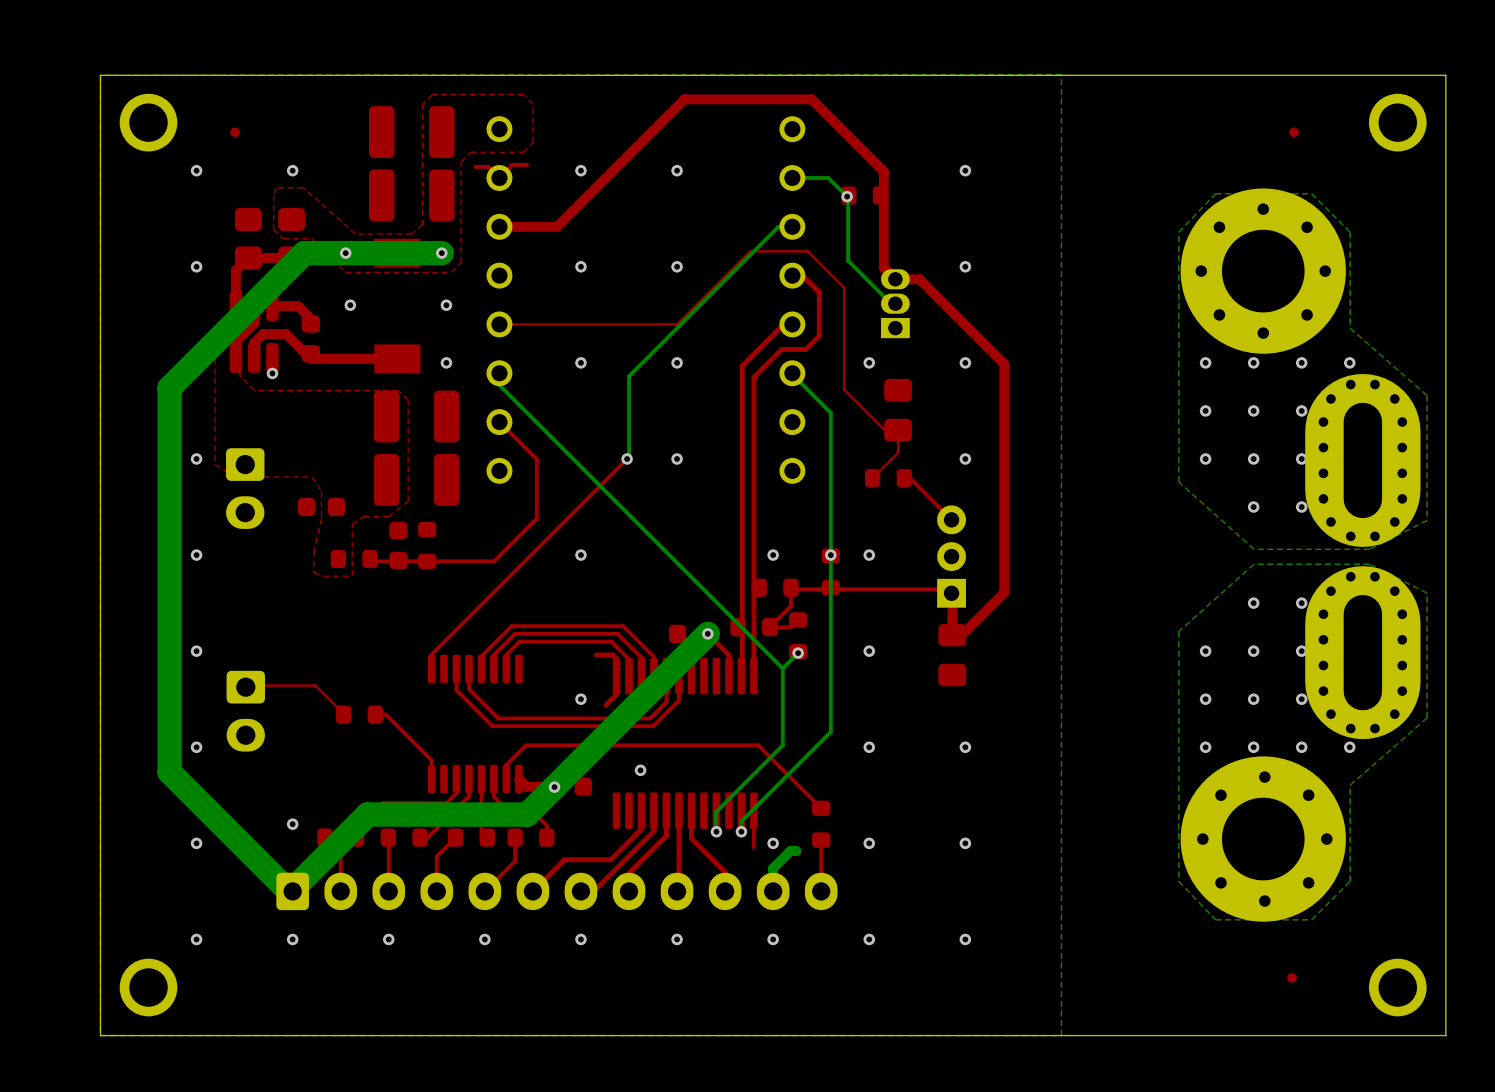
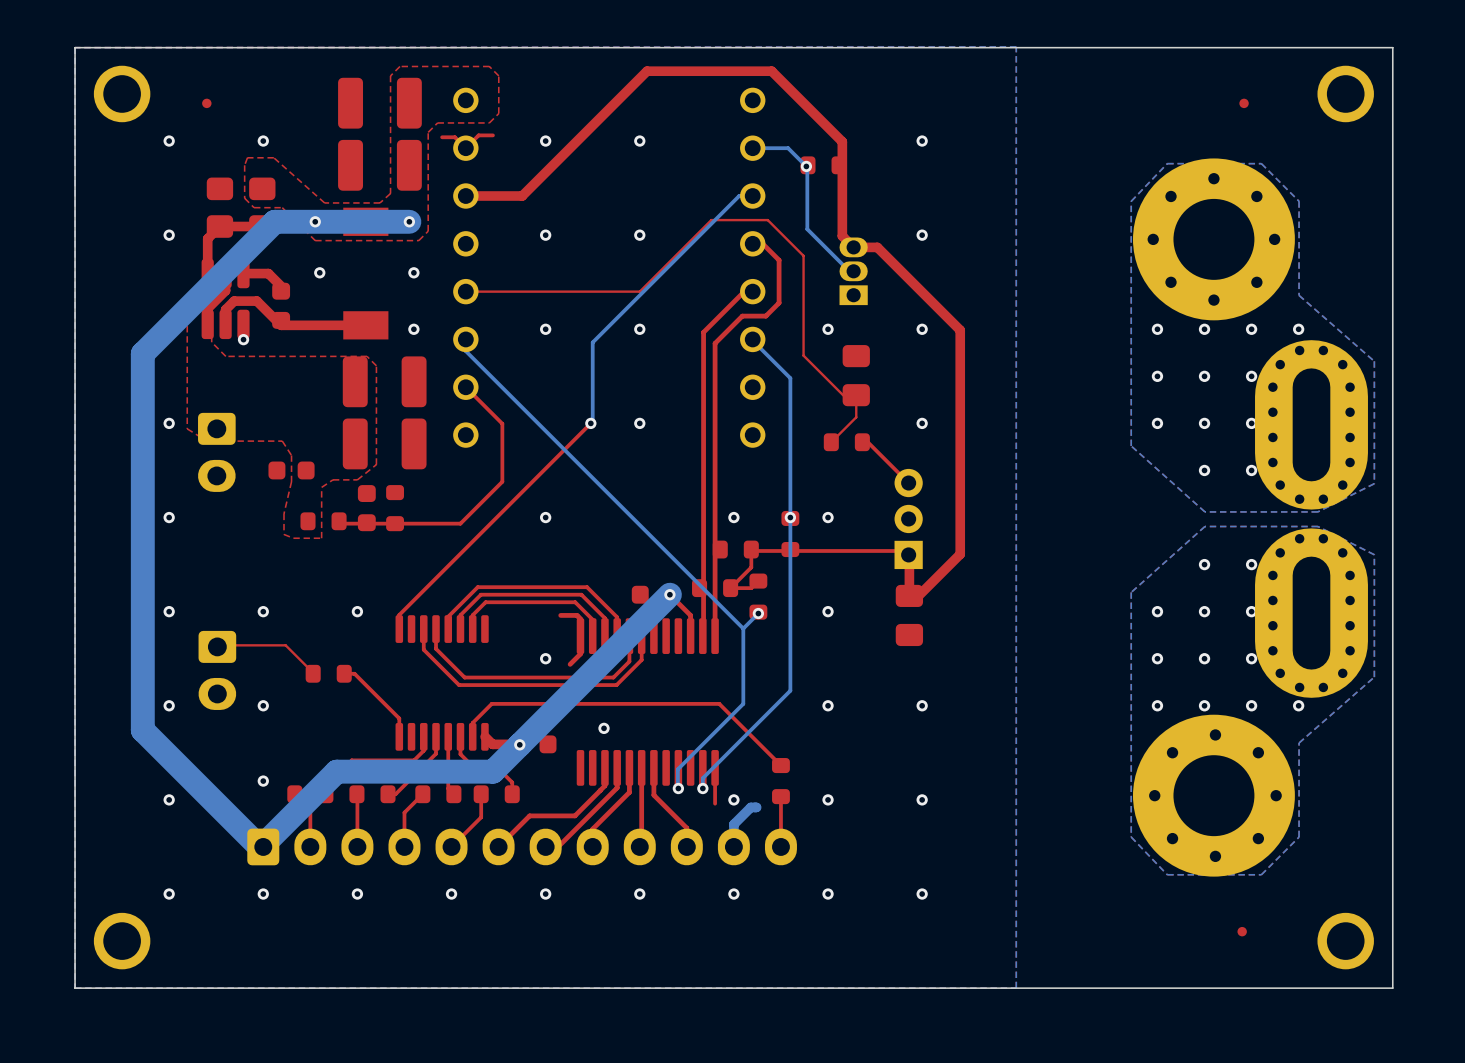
via: none -> (263, 611)
via: none -> (357, 611)
via: none -> (263, 705)

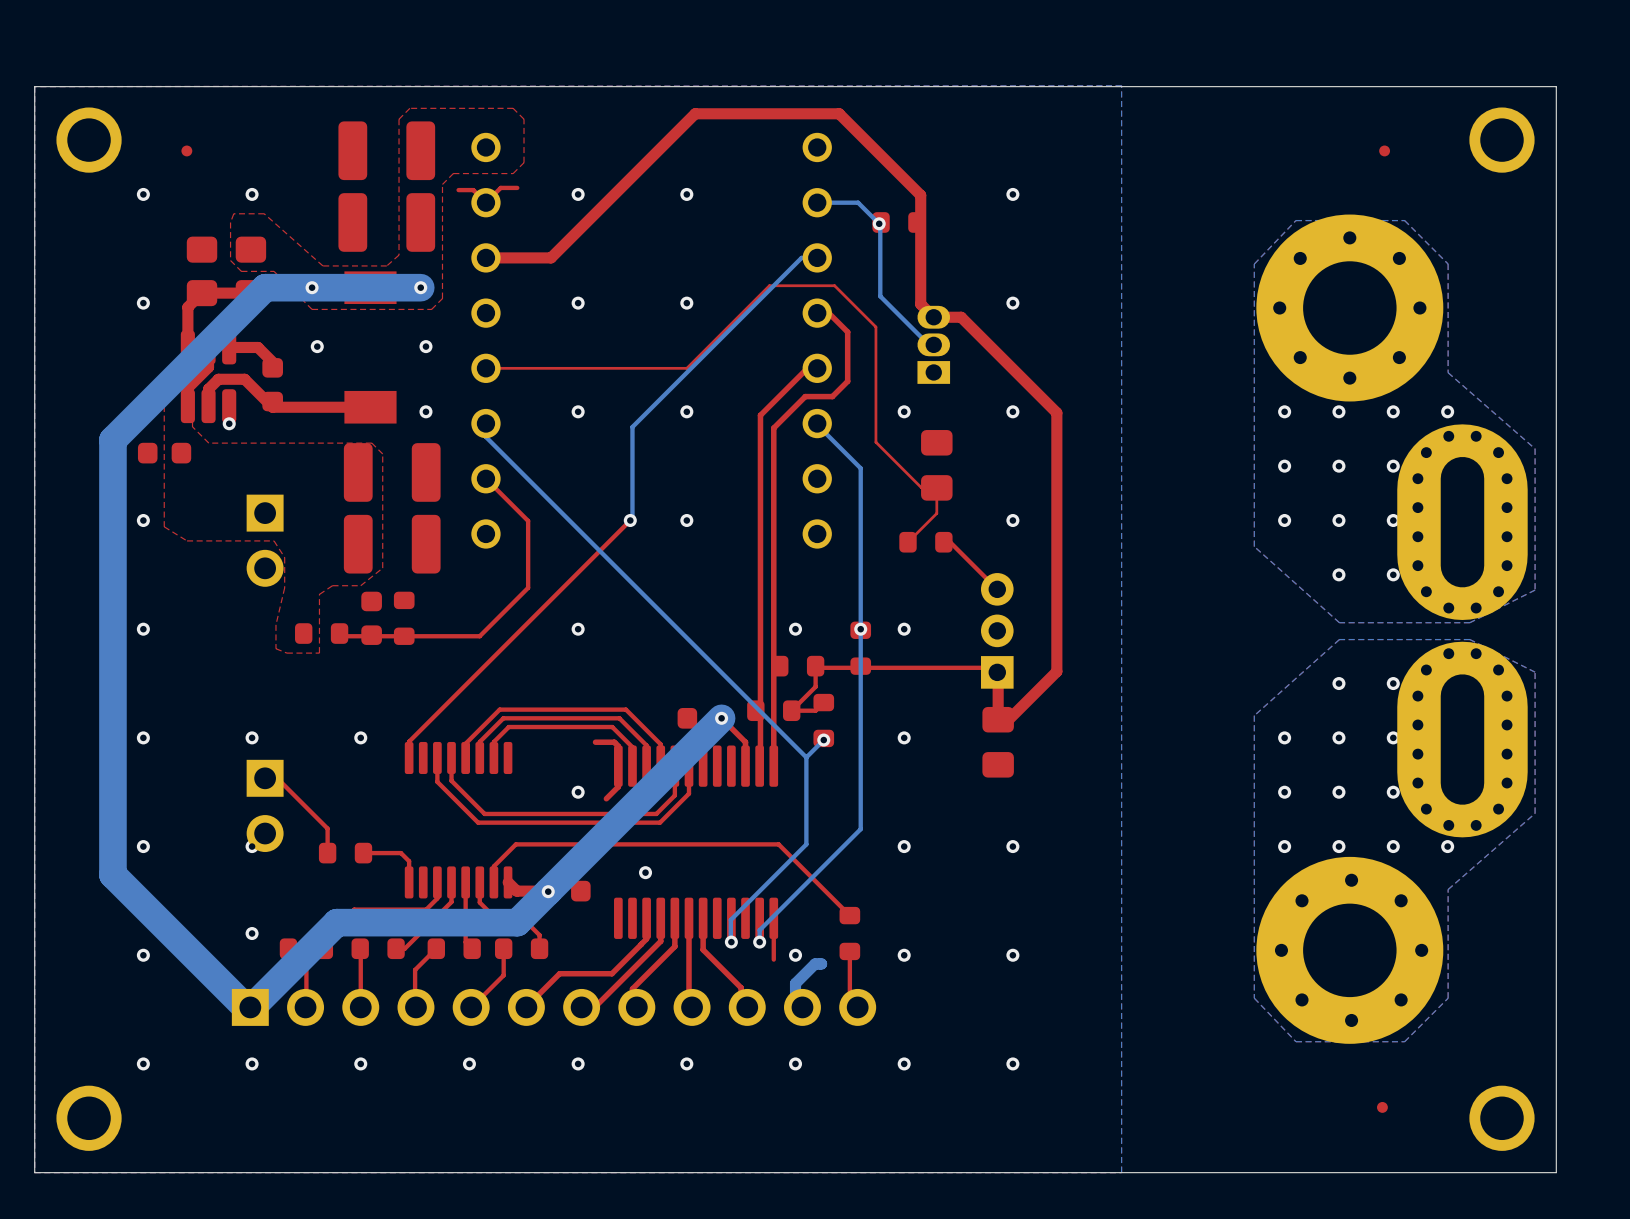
part: none -> (265, 540)
part: (216, 452) -> none
part position: (291, 470) -> (164, 453)
top track: (216, 645) (285, 645) (313, 673) -> none
top track: none -> (265, 778) (277, 778) (327, 828) (327, 853)
part: (217, 670) -> none
part: none -> (265, 805)
part position: (328, 673) -> (345, 853)
top track: (344, 673) (354, 673) (392, 711) -> (363, 853) (400, 853)
part footprint: [247, 828, 797, 866] -> [231, 988, 877, 1026]

